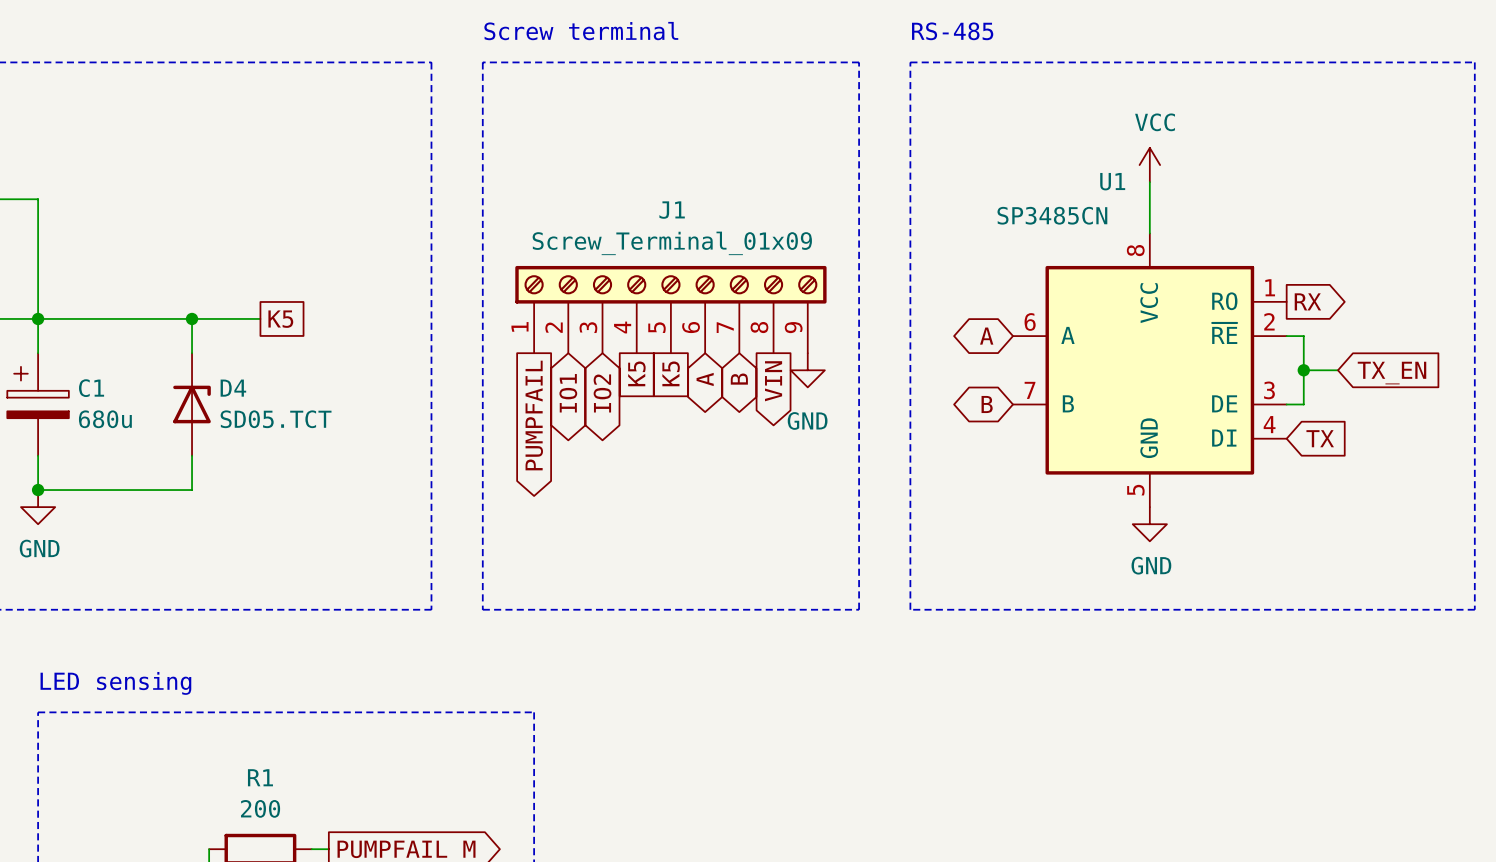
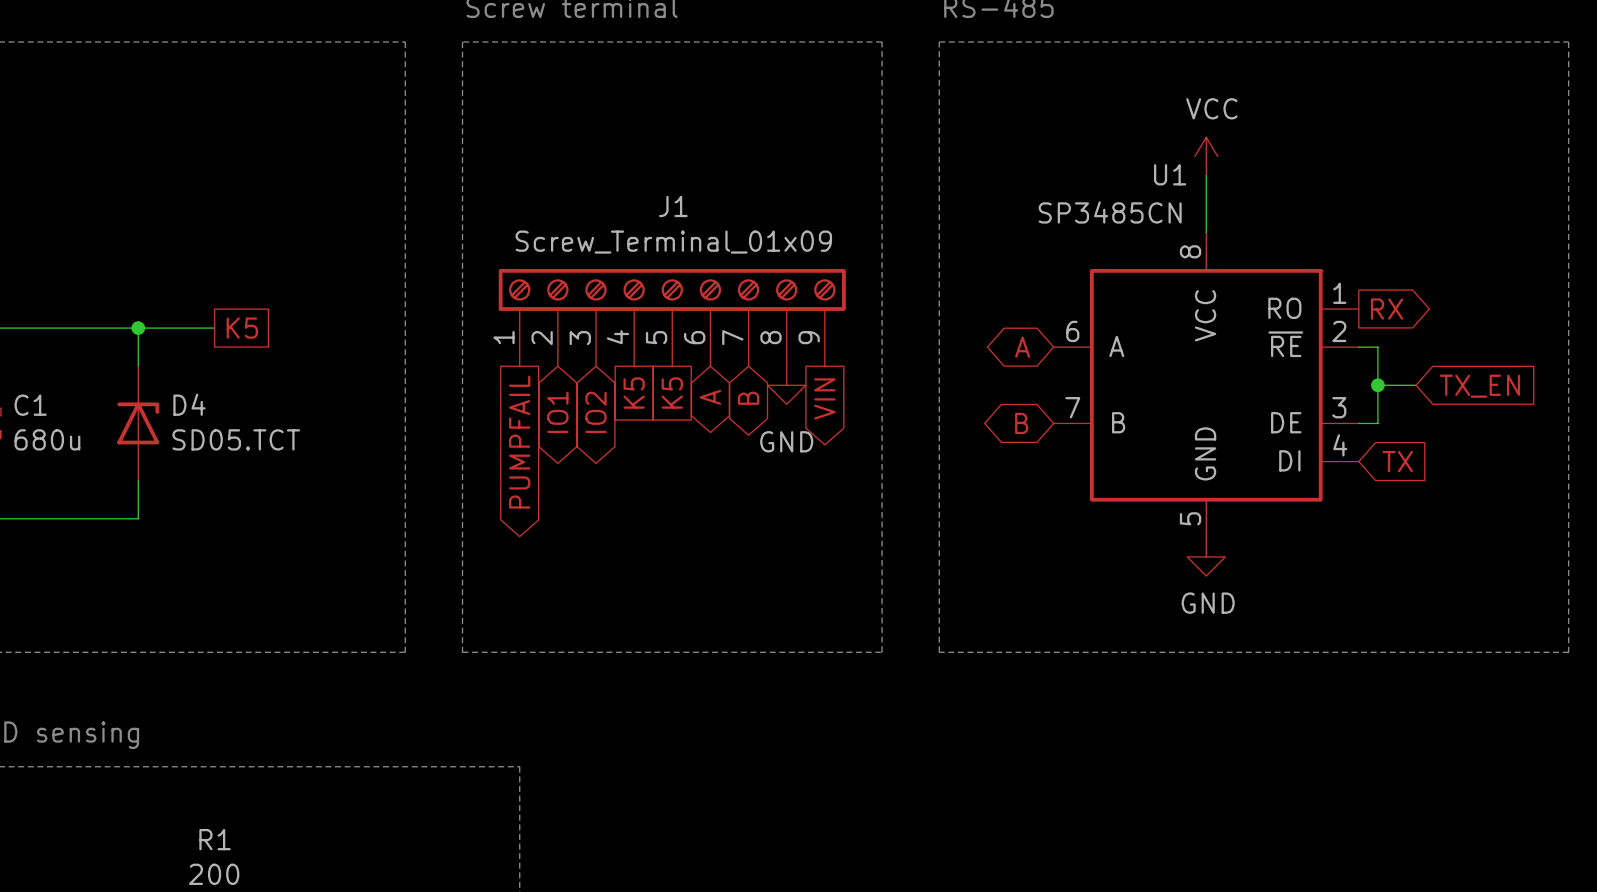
power symbol position: GND (807, 370) -> GND (786, 385)
global label position: VIN (773, 381) -> VIN (824, 398)

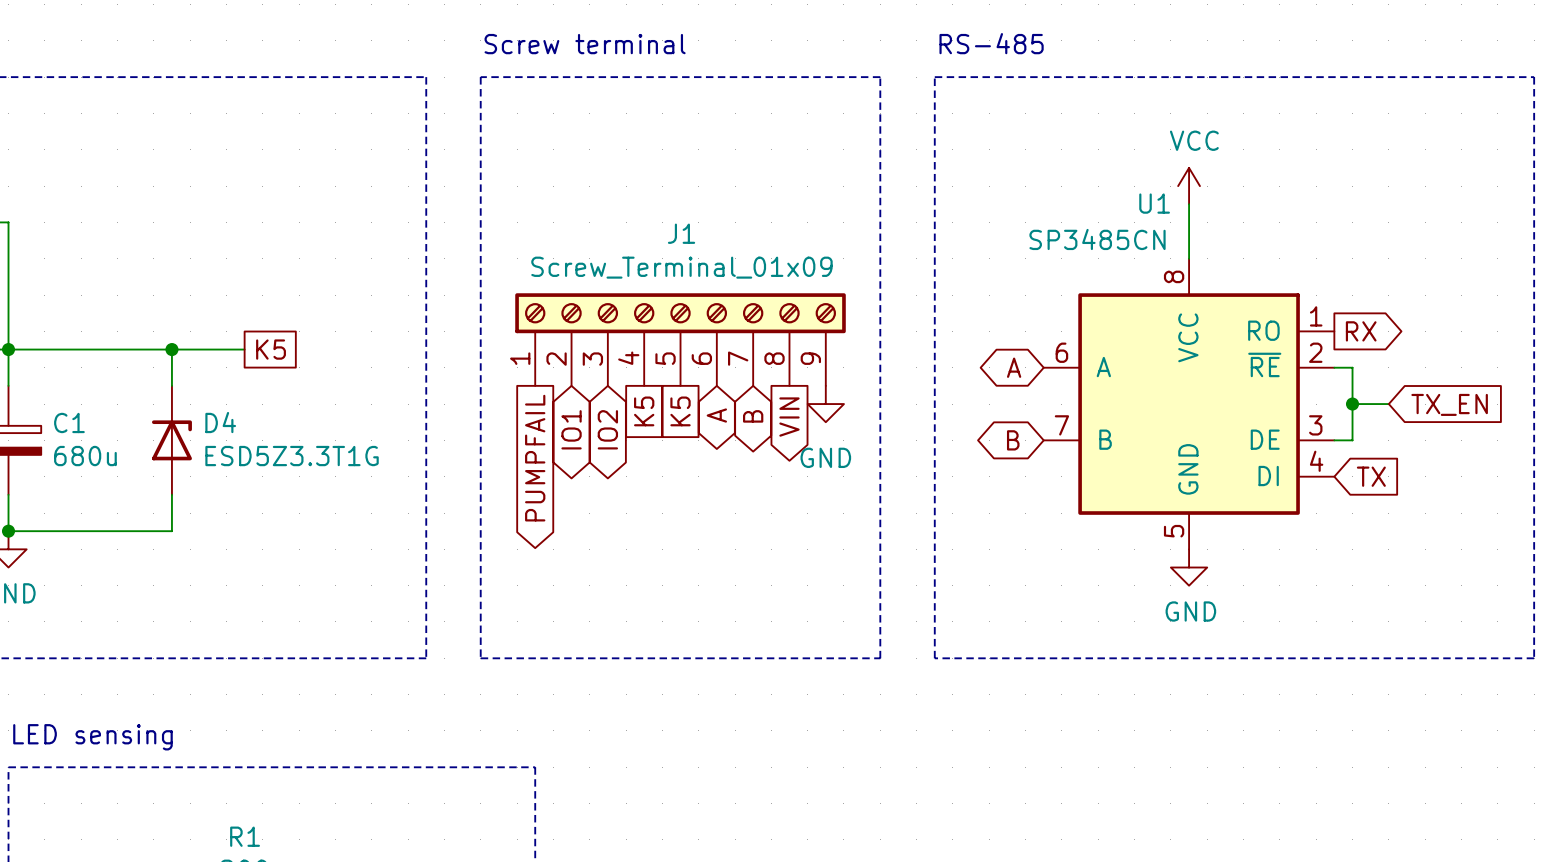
power symbol position: GND (786, 385) -> GND (825, 404)
global label position: VIN (824, 398) -> VIN (789, 417)
D4 value: SD05.TCT (236, 439) -> ESD5Z3.3T1G (292, 456)

